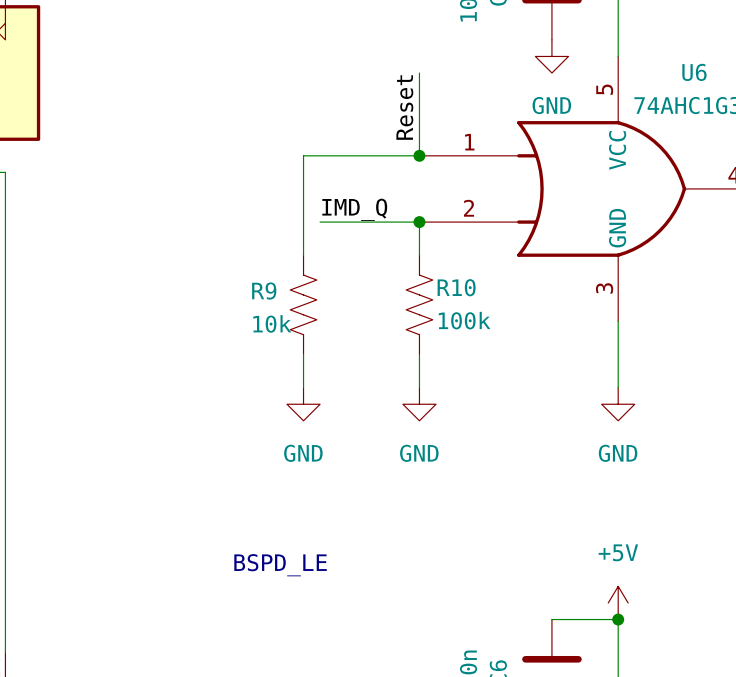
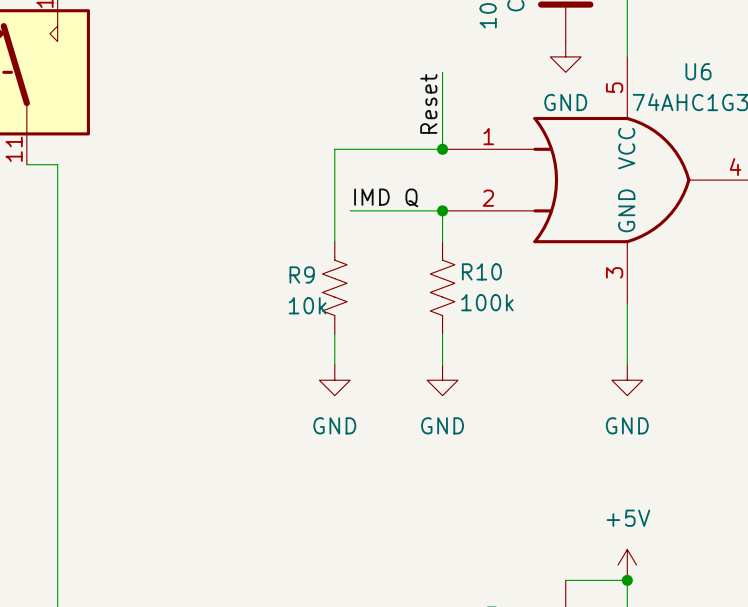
label: IMD_Q (354, 209) -> IMD Q (386, 197)
text: BSPD_LE (280, 565) -> none

